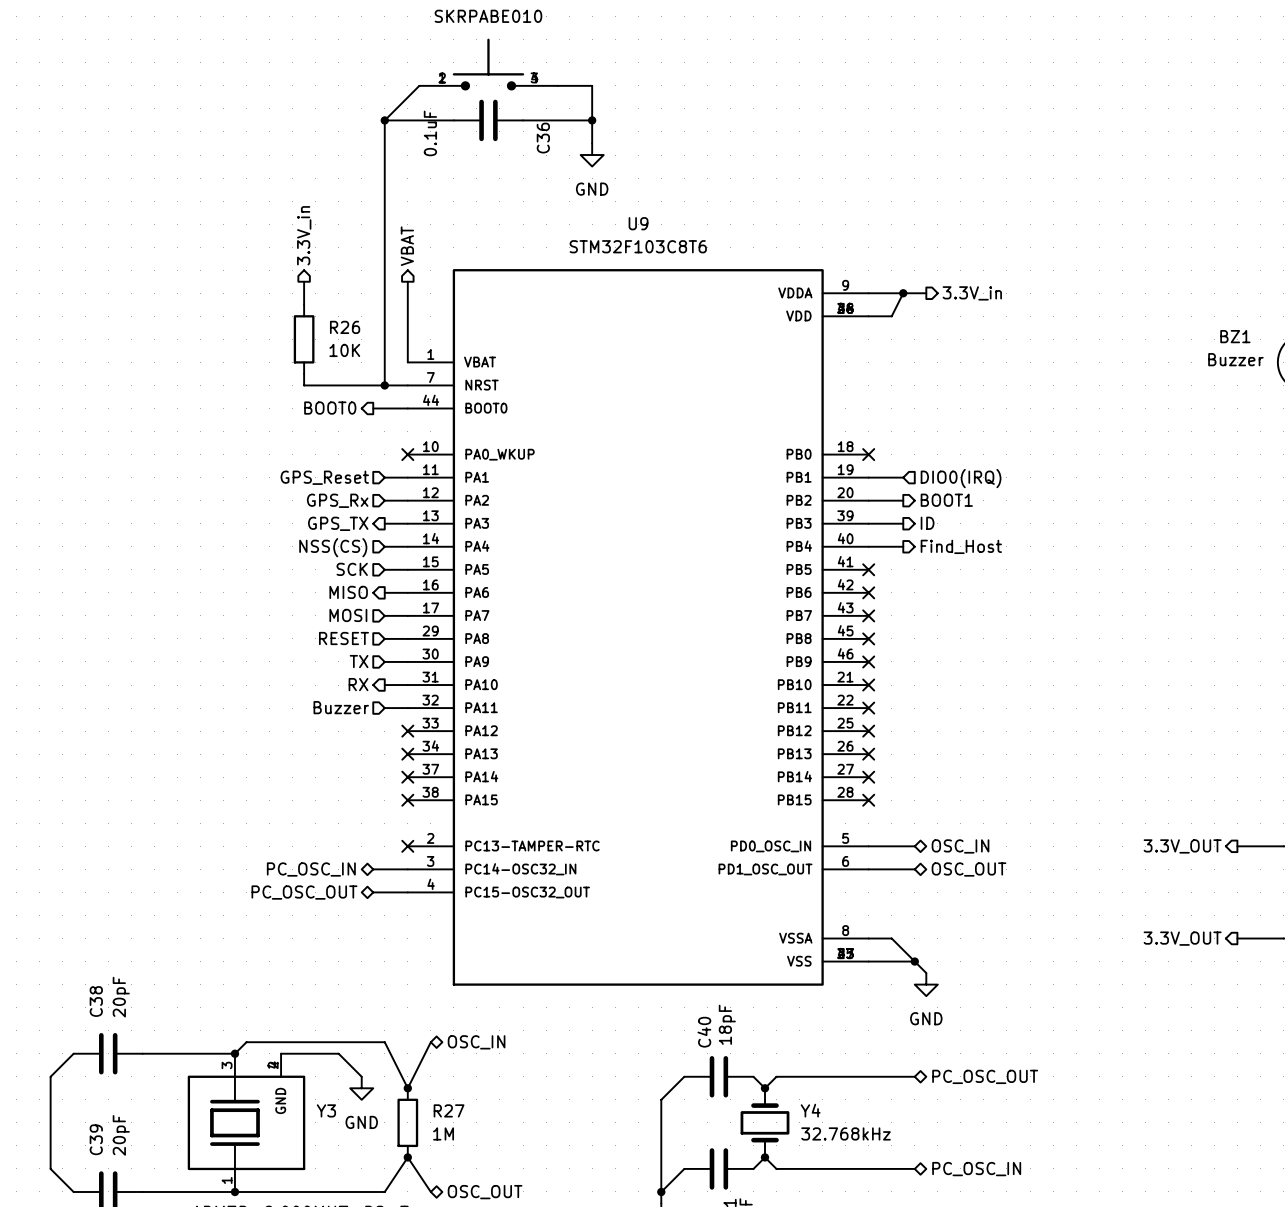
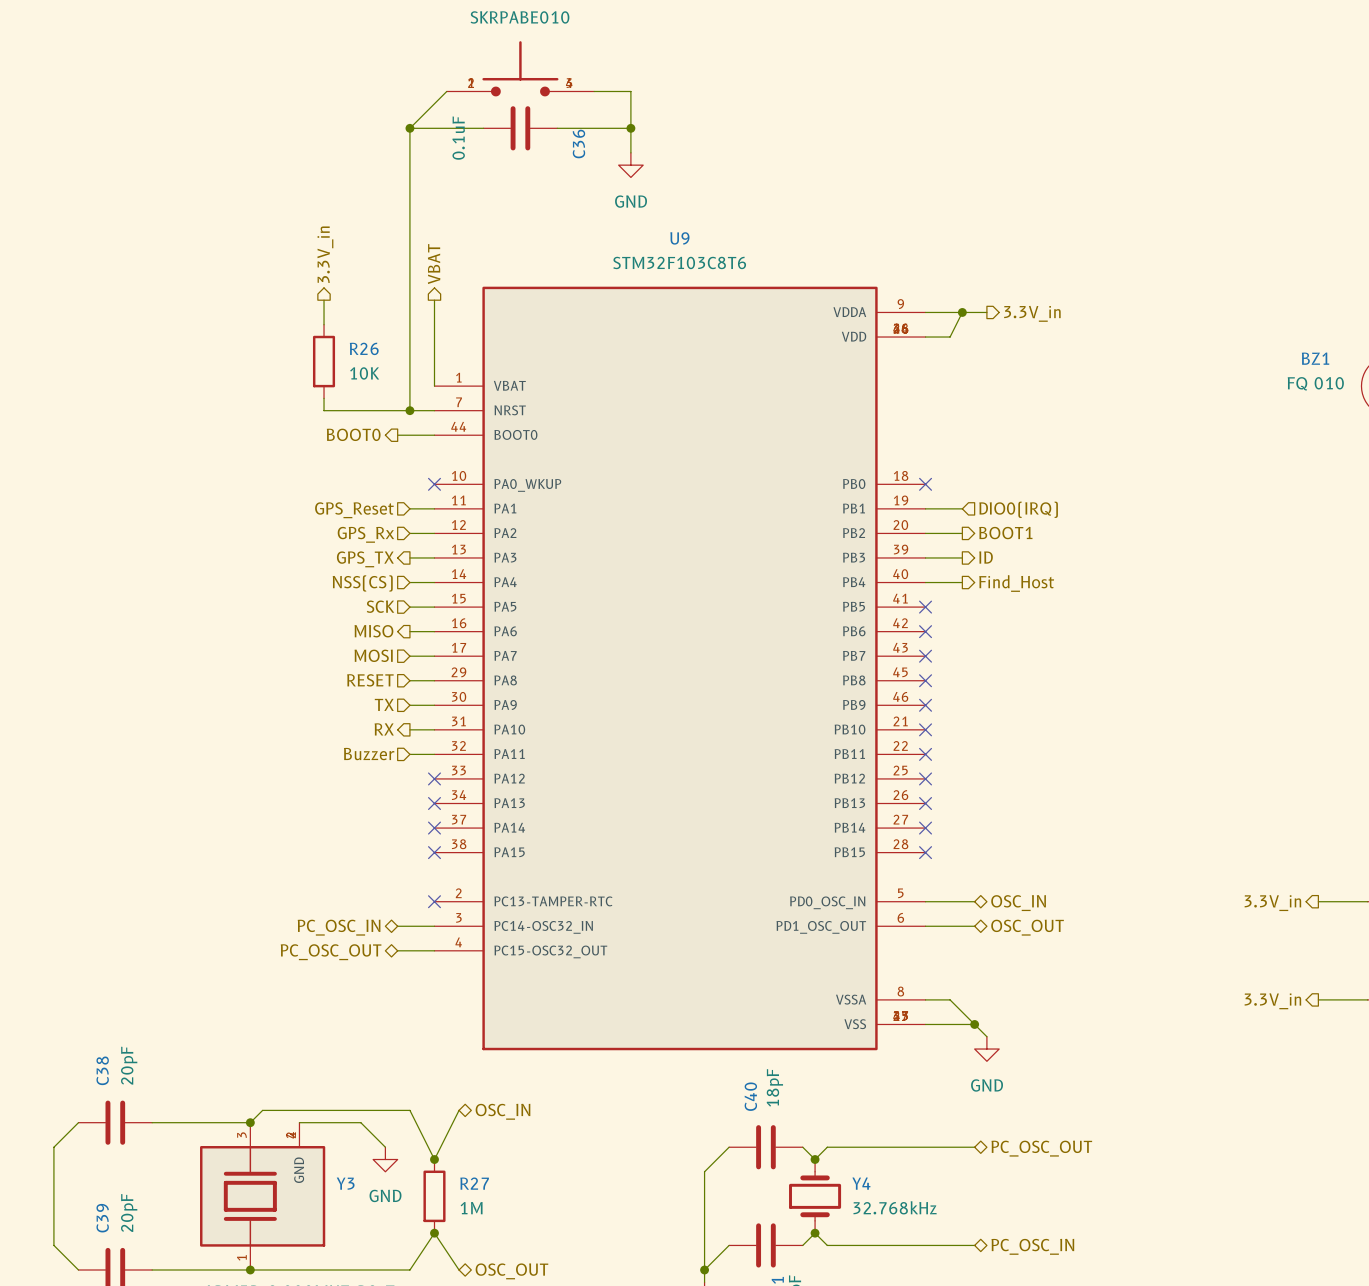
BZ1 value: Buzzer (1235, 359) -> FQ 010 (1315, 383)
hierarchical label: 3.3V_OUT (1182, 846) -> 3.3V_in (1272, 903)
hierarchical label: 3.3V_OUT (1182, 938) -> 3.3V_in (1272, 1001)

